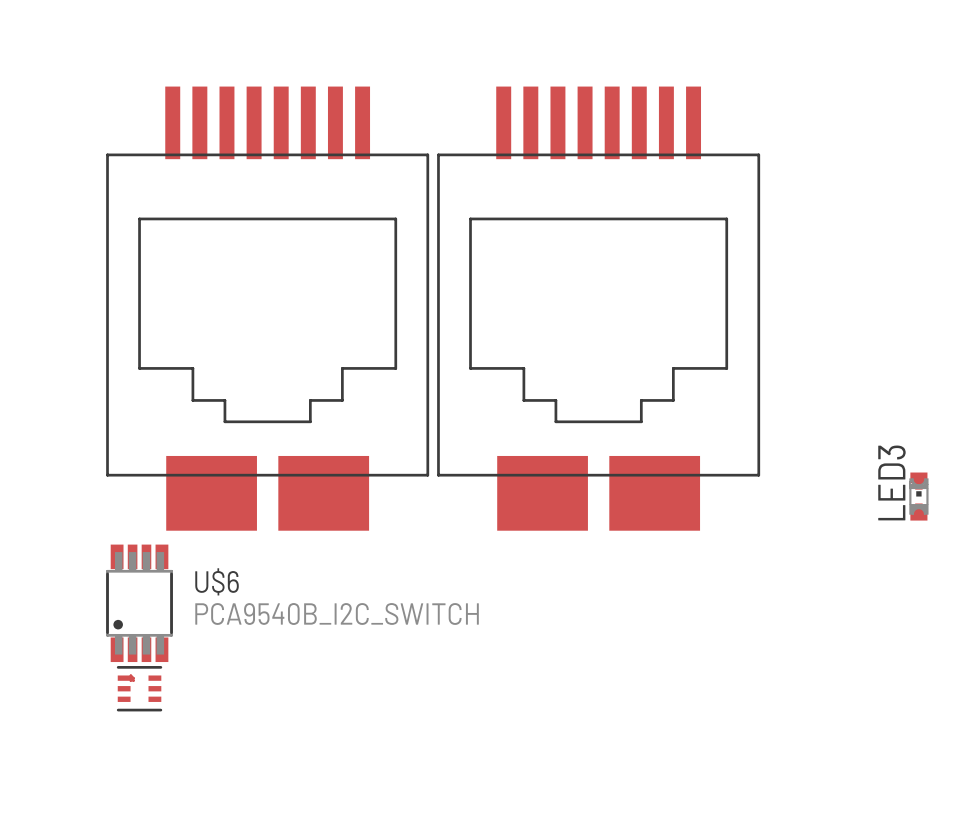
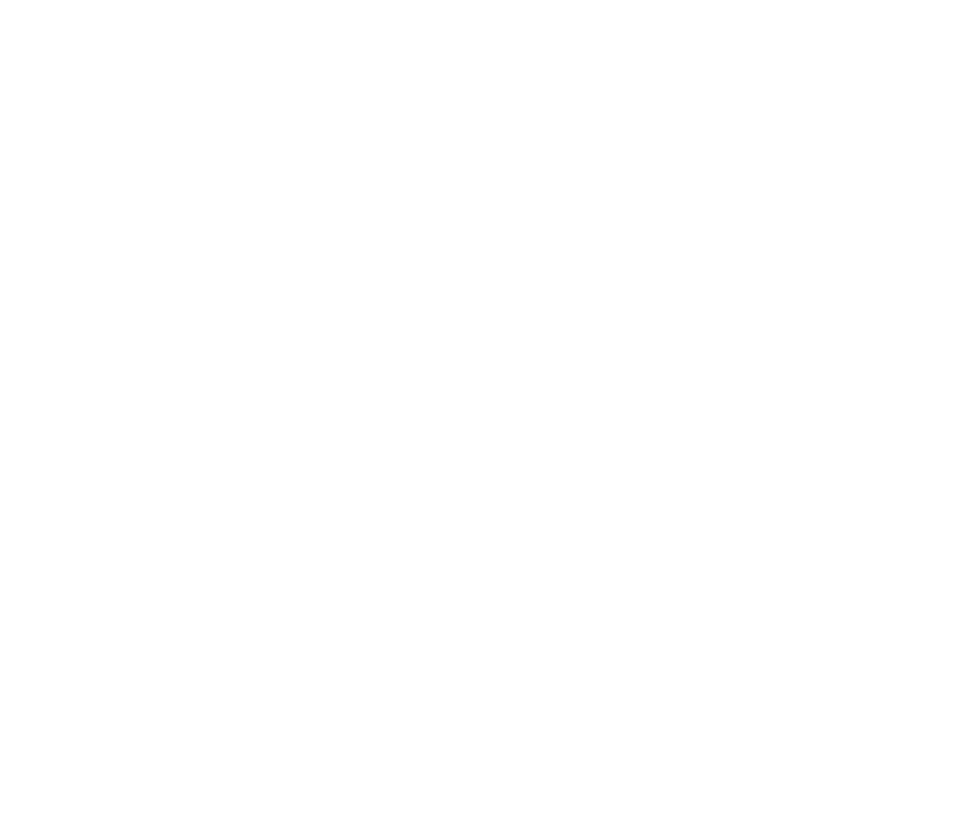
part: (267, 308) -> none
part: (598, 308) -> none
LED3: (918, 496) -> none
U$6: PCA9540B_I2C_SWITCH (139, 603) -> none
part: (139, 688) -> none

